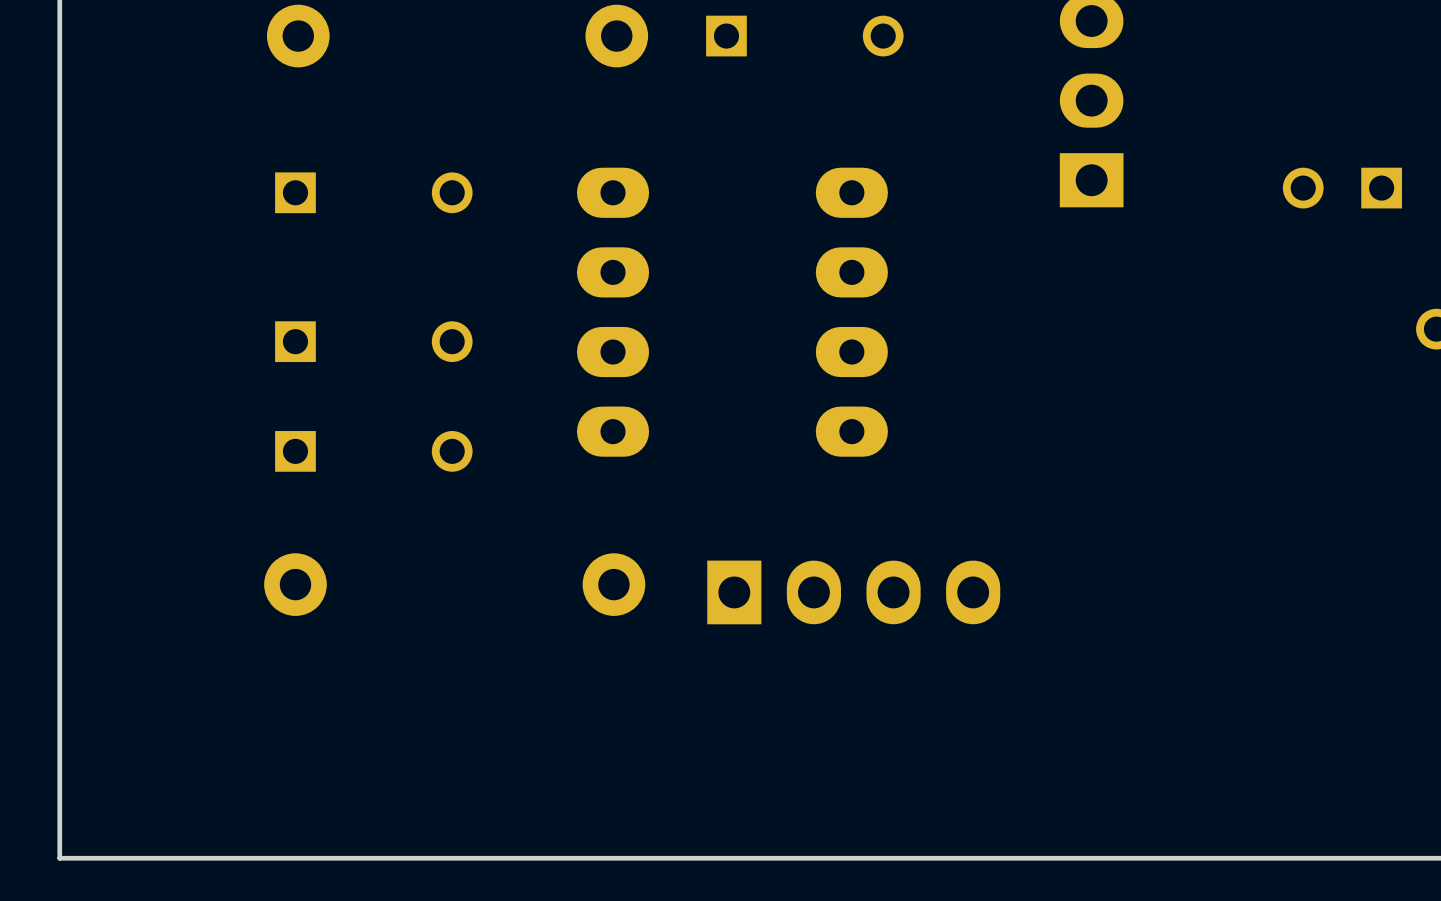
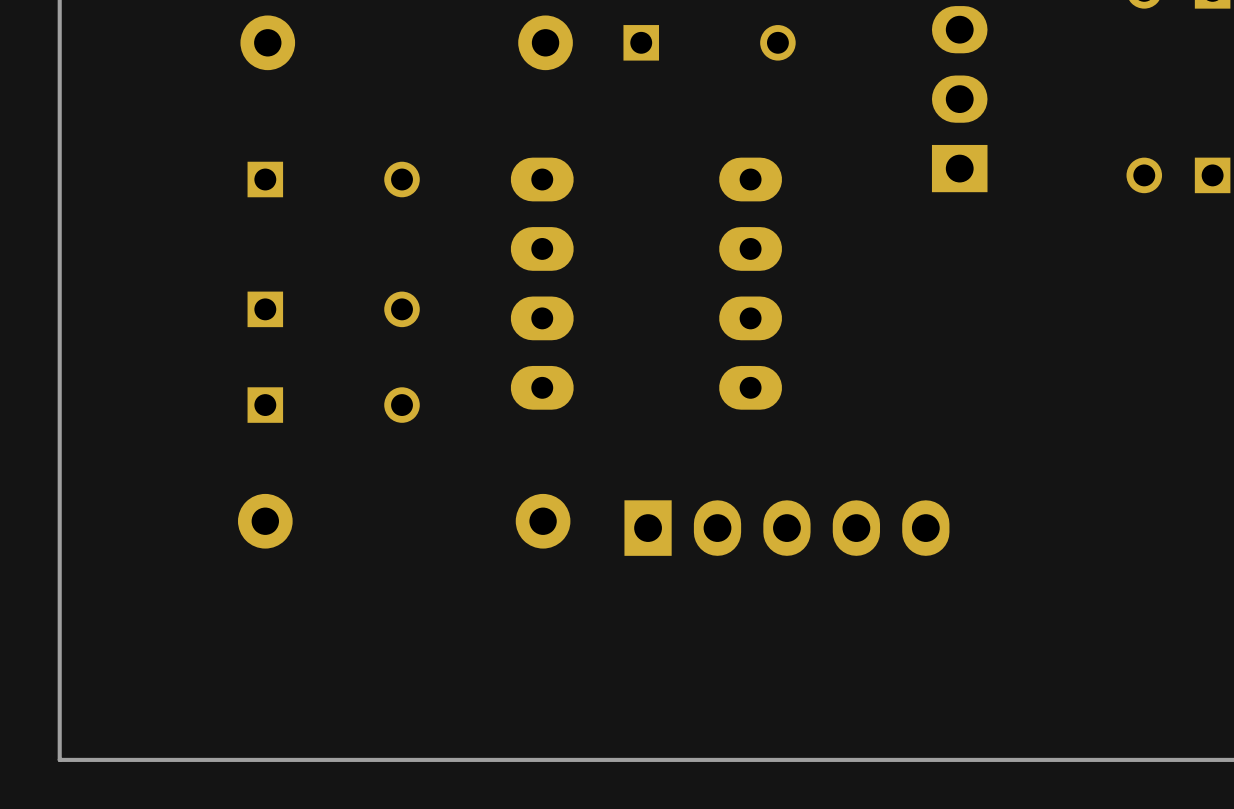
part: none -> (786, 528)

